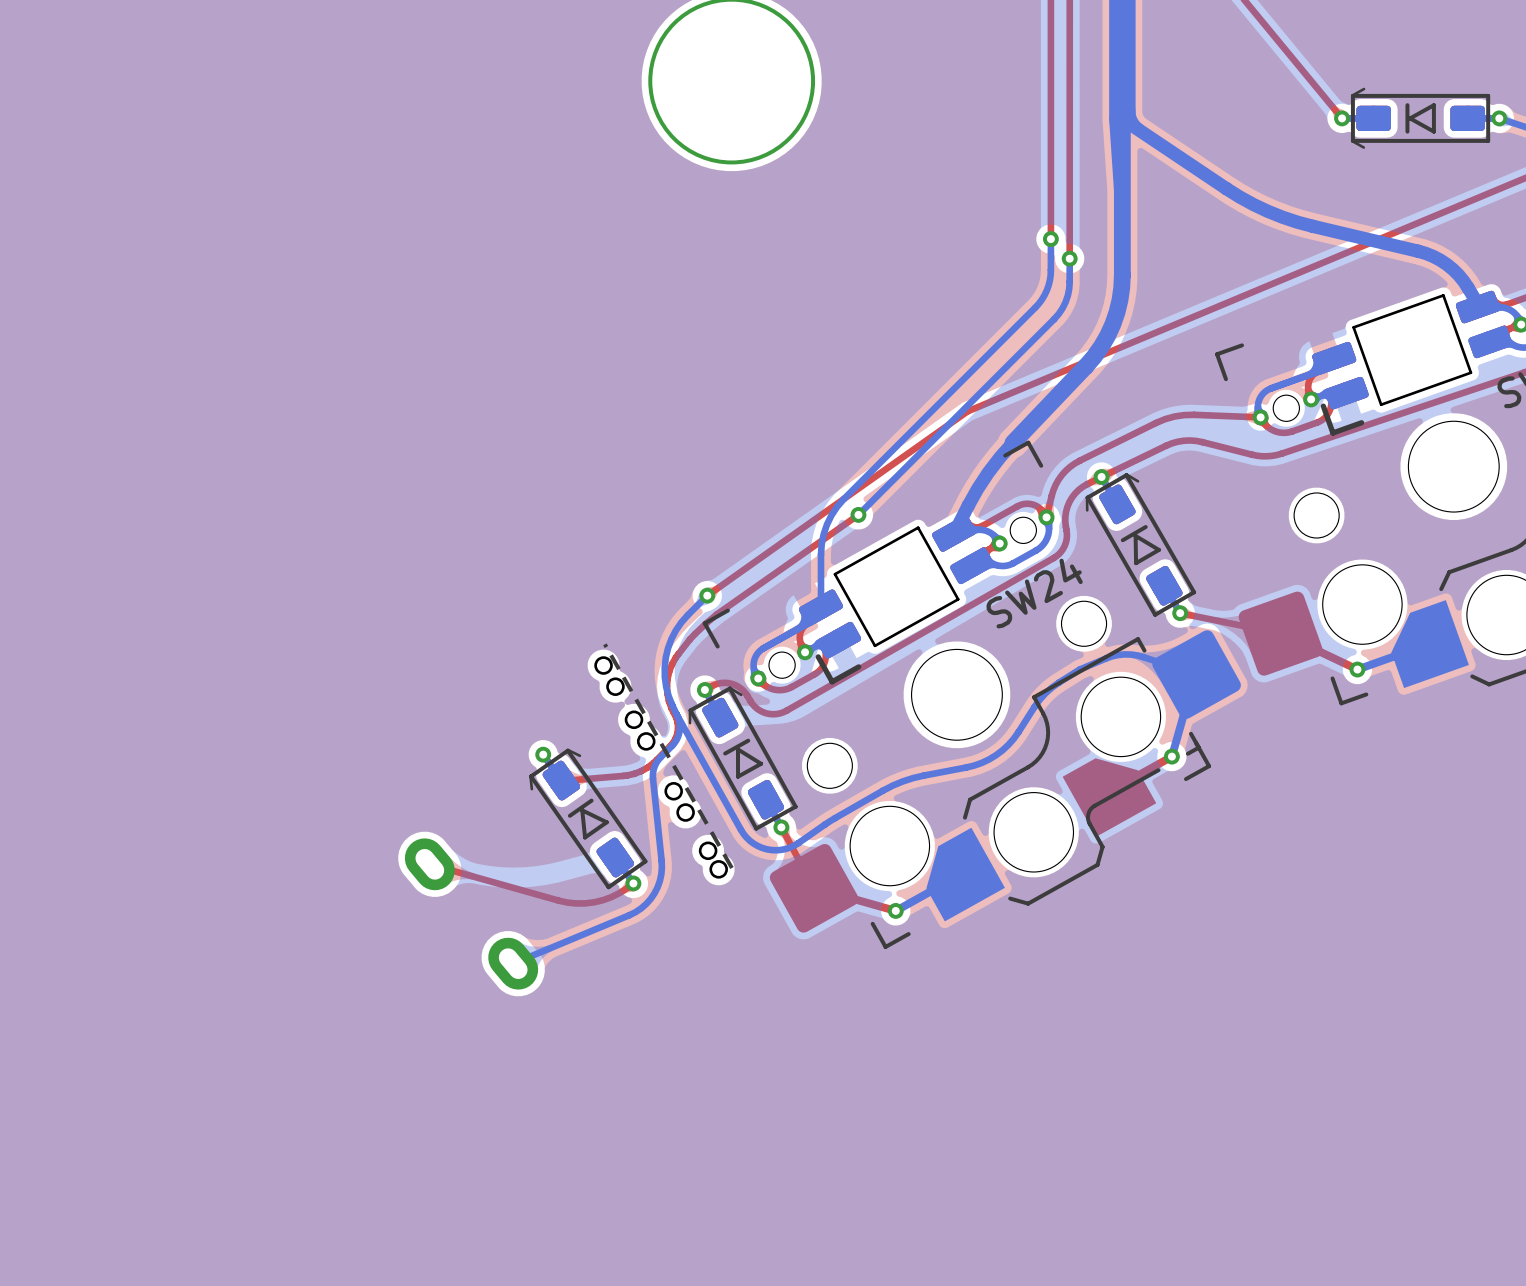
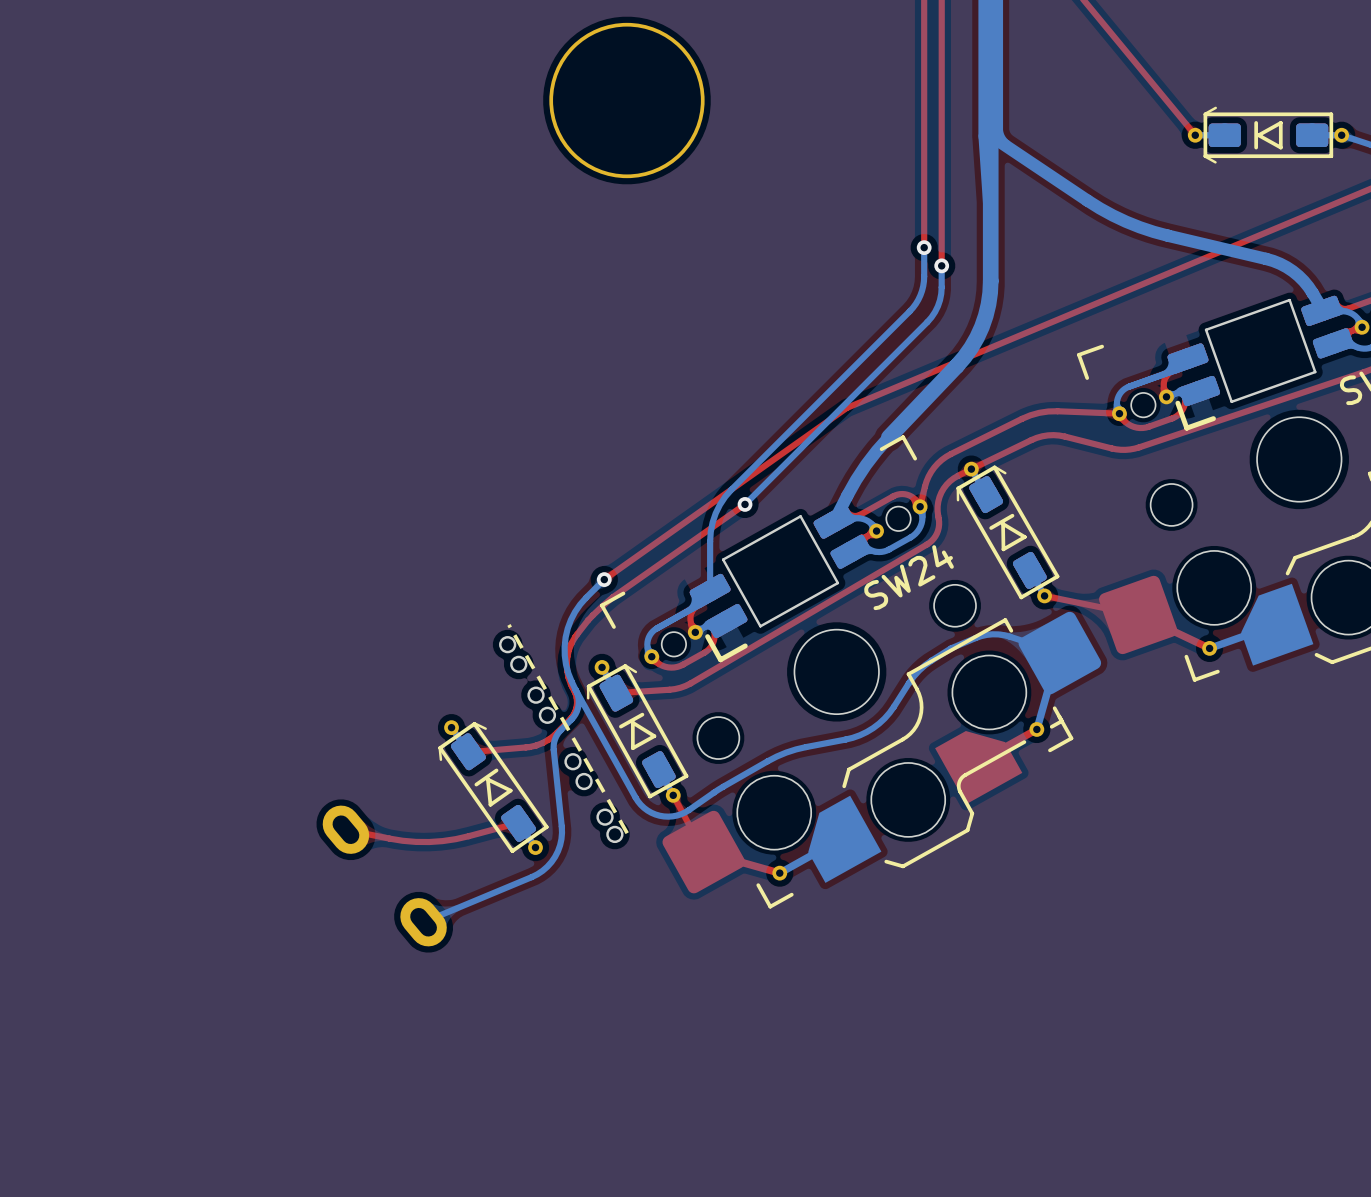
top track: (1053, 557) (783, 712) (769, 714) (760, 710) (752, 703) (743, 690) (731, 683) (717, 683) (704, 689) -> (927, 544) (685, 685) (669, 689) (616, 693)
top track: (429, 864) (558, 900) (576, 903) (603, 900) (619, 892) (633, 883) -> (345, 829) (402, 840) (429, 842) (455, 839) (518, 822)

